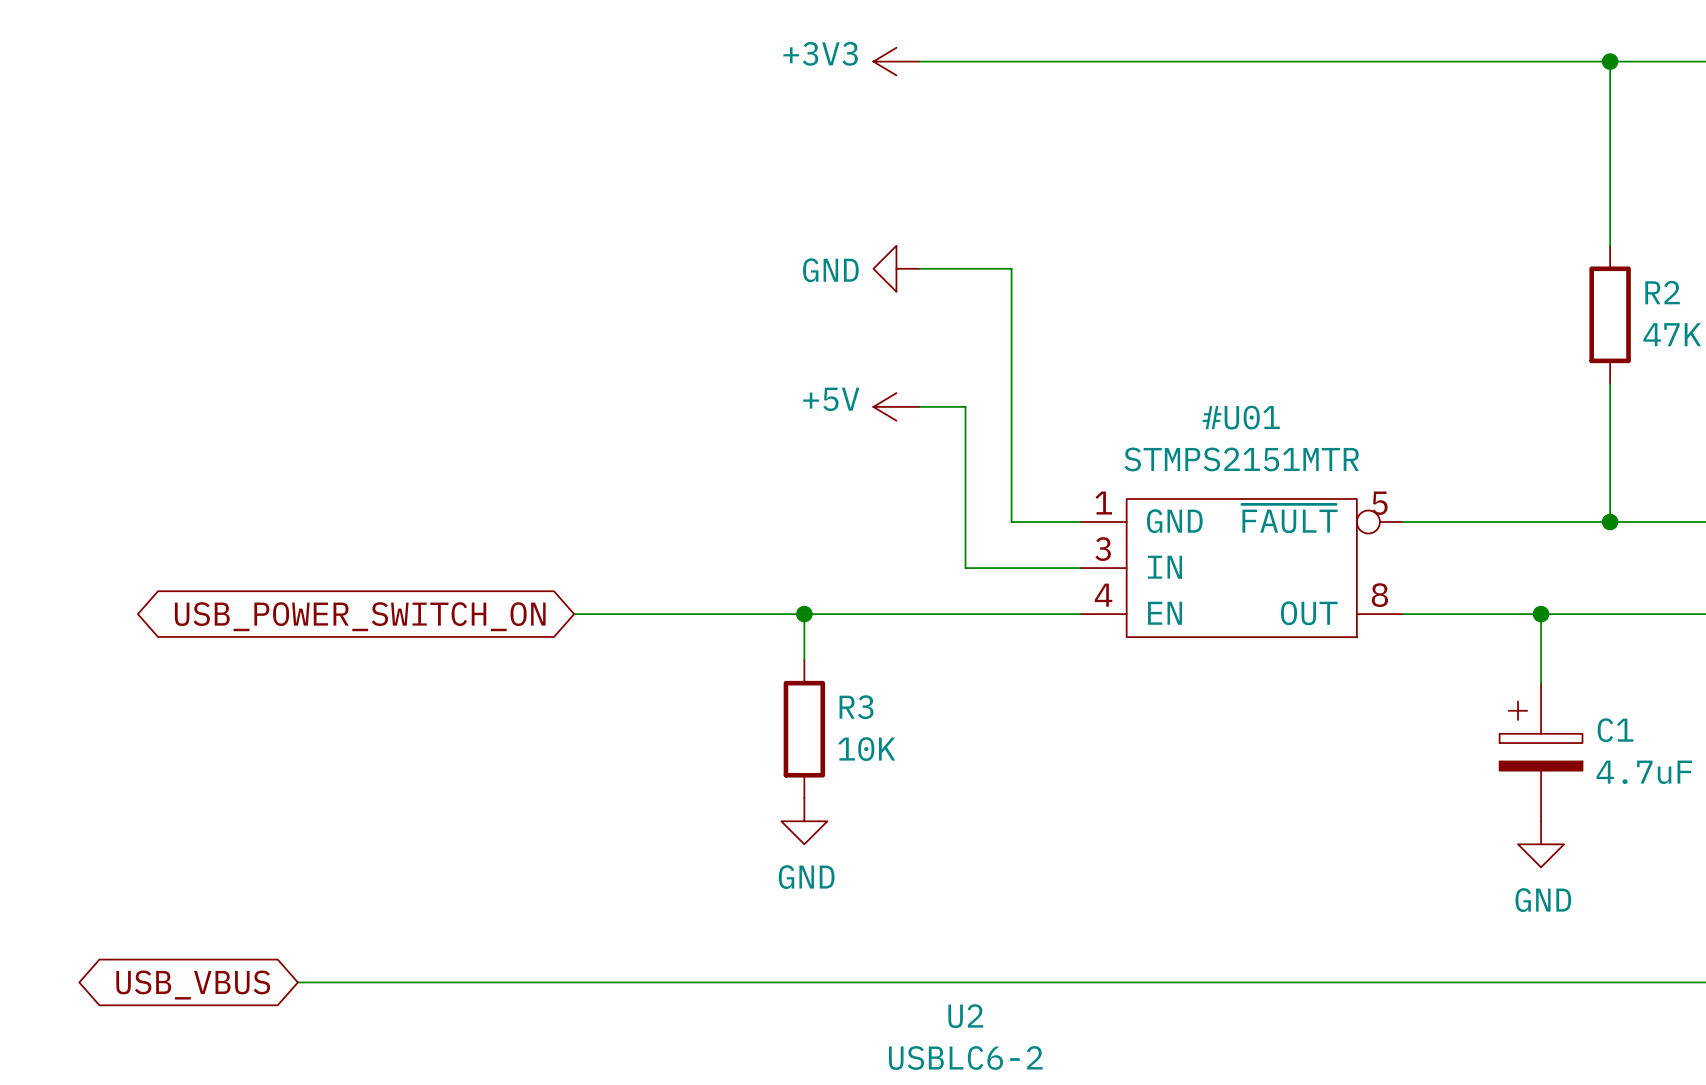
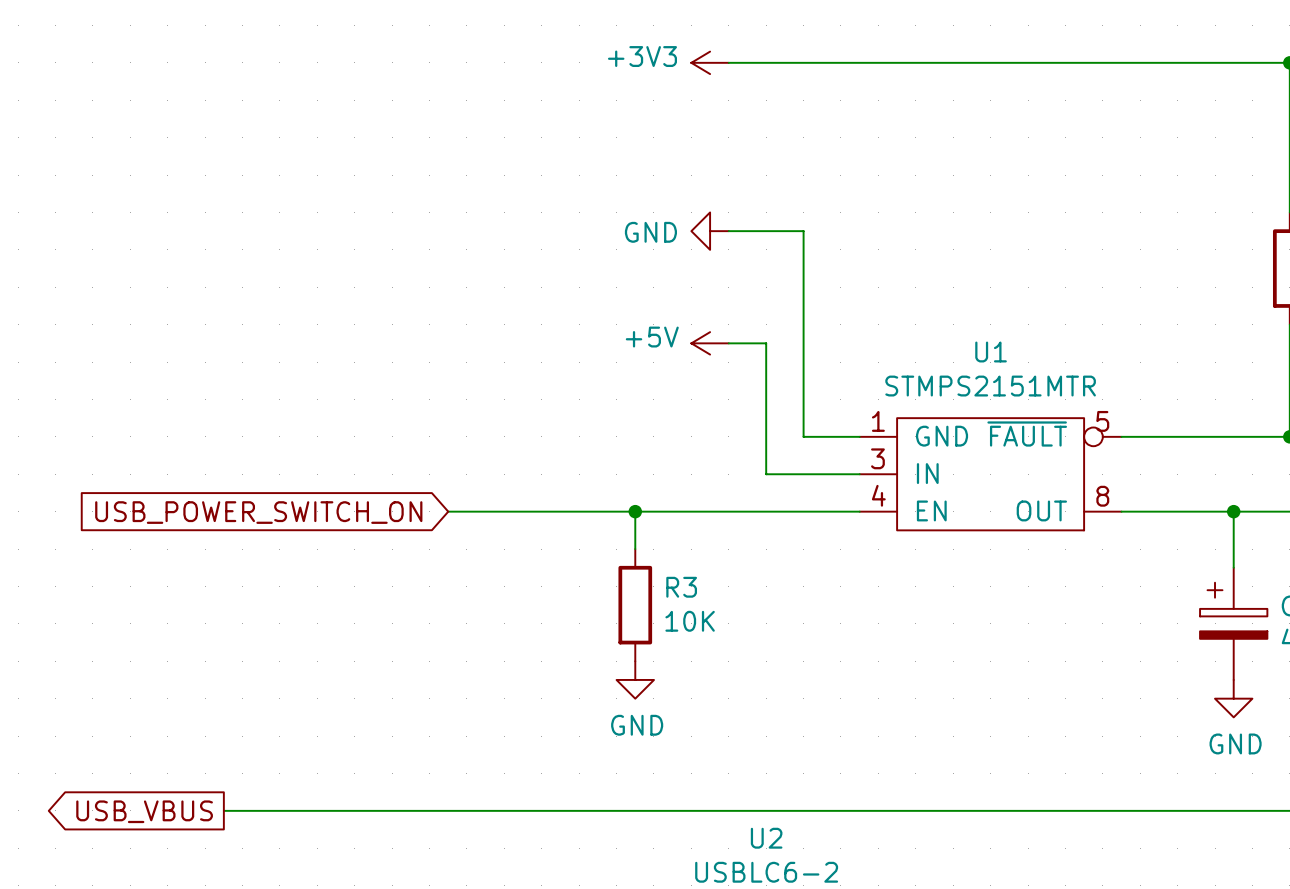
#U01: STMPS2151MTR (1241, 568) -> none
U1: none -> STMPS2151MTR (990, 474)
global label shape: bidirectional (360, 616) -> input (258, 512)
global label shape: bidirectional (193, 985) -> output (144, 811)

